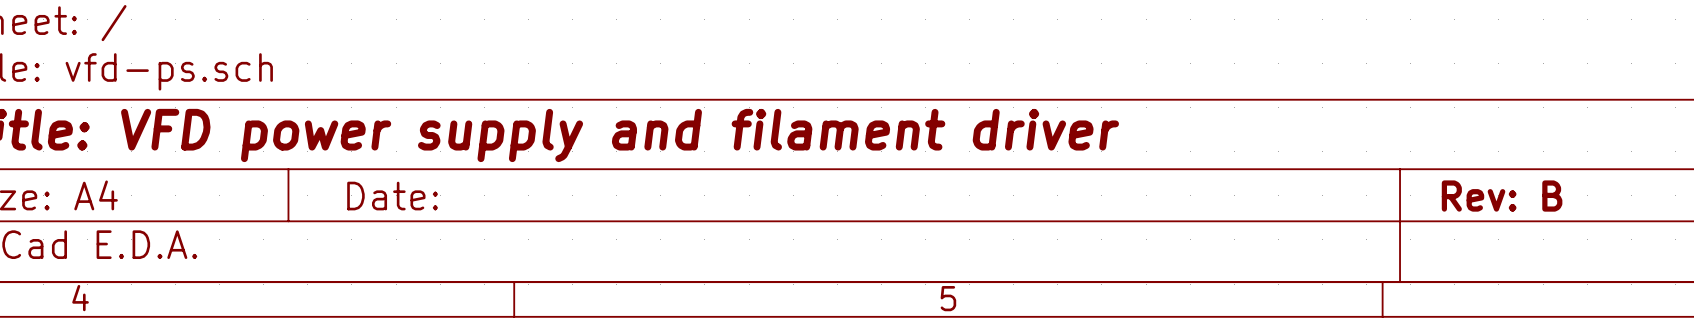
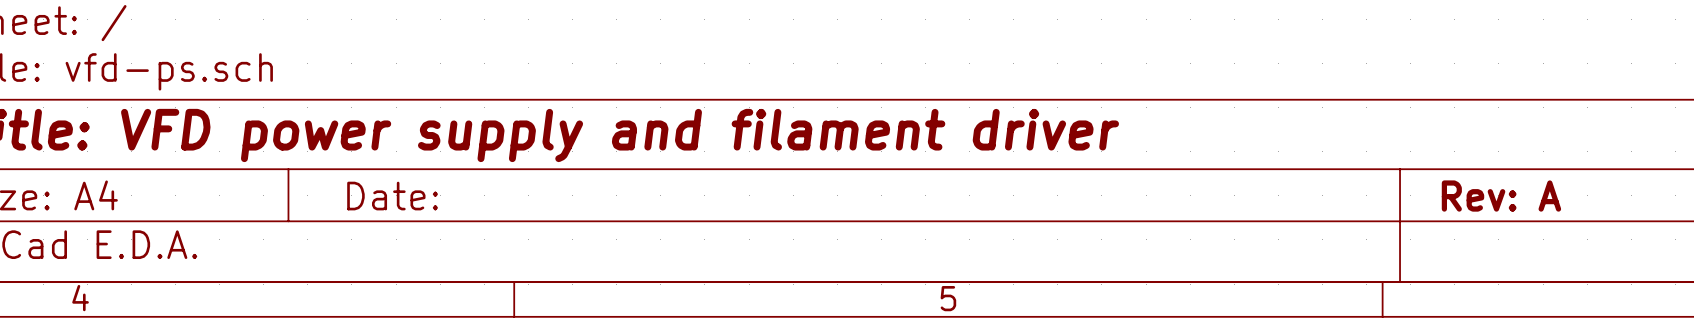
title block: Rev: B (1502, 196) -> Rev: A (1501, 196)

